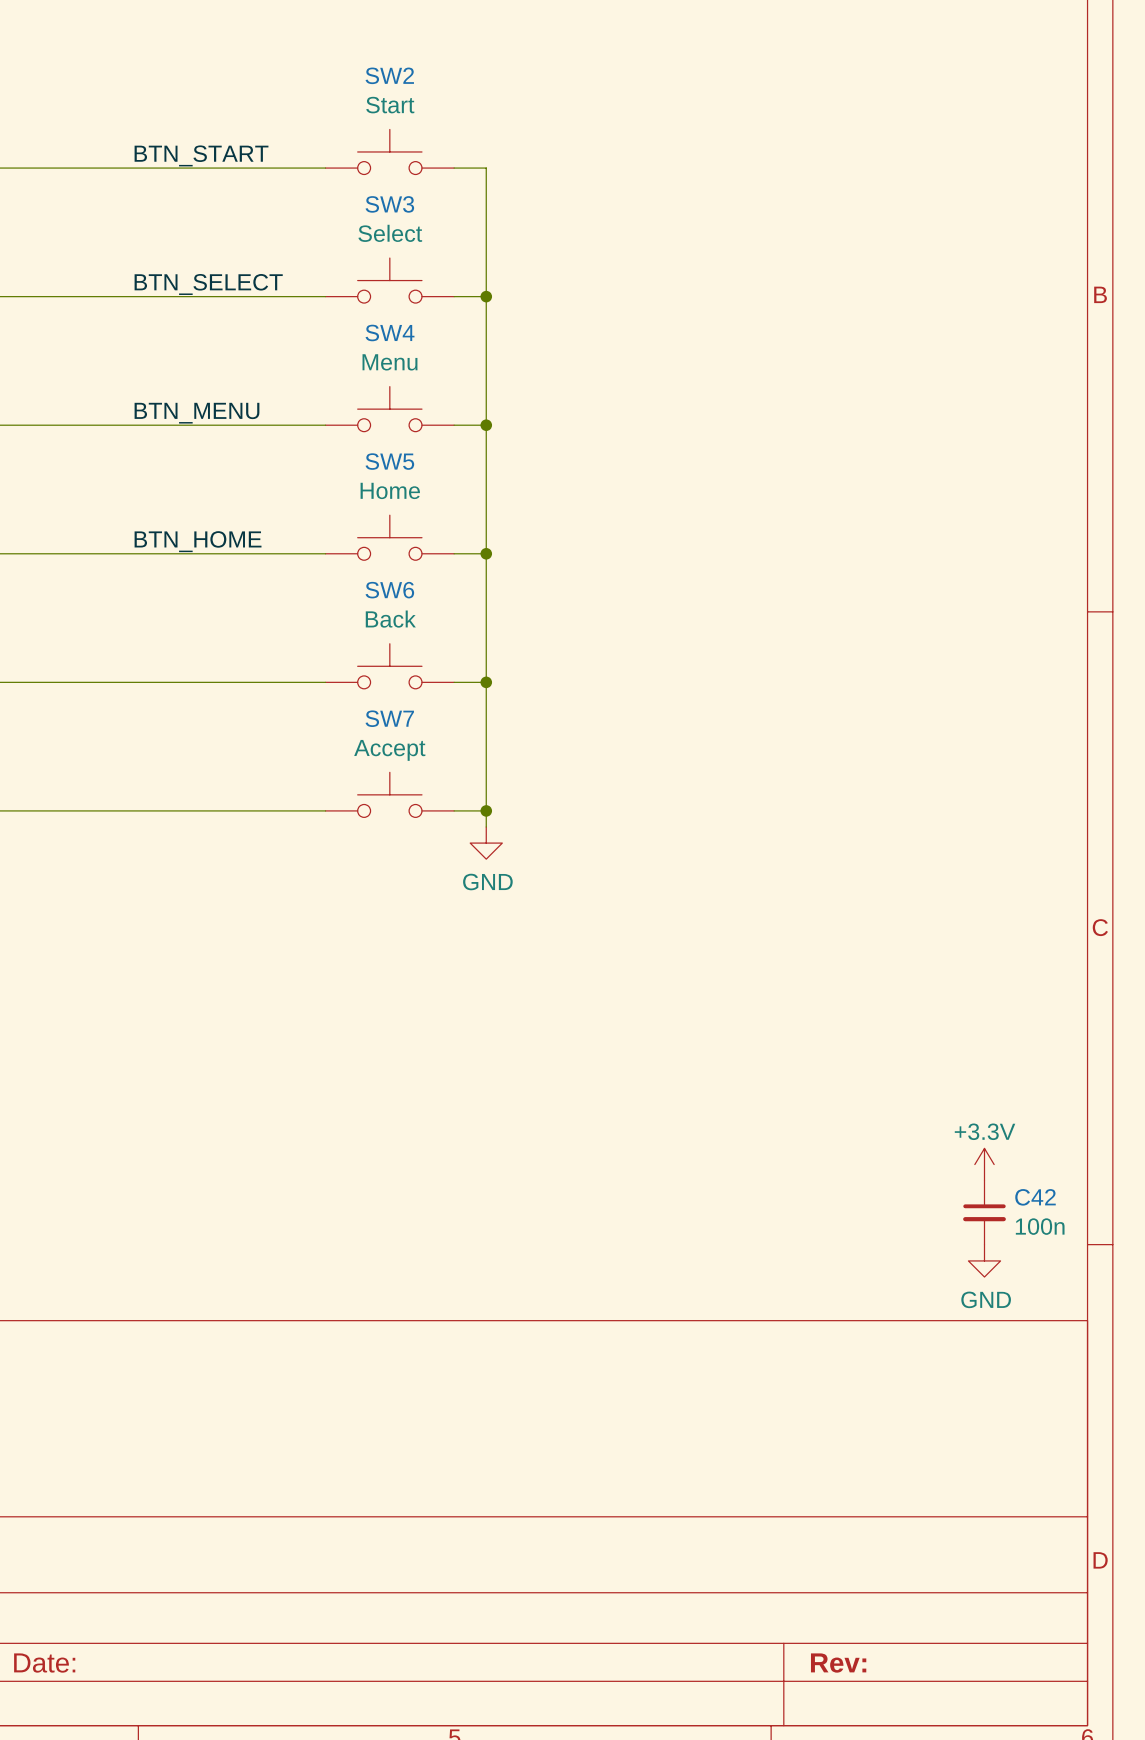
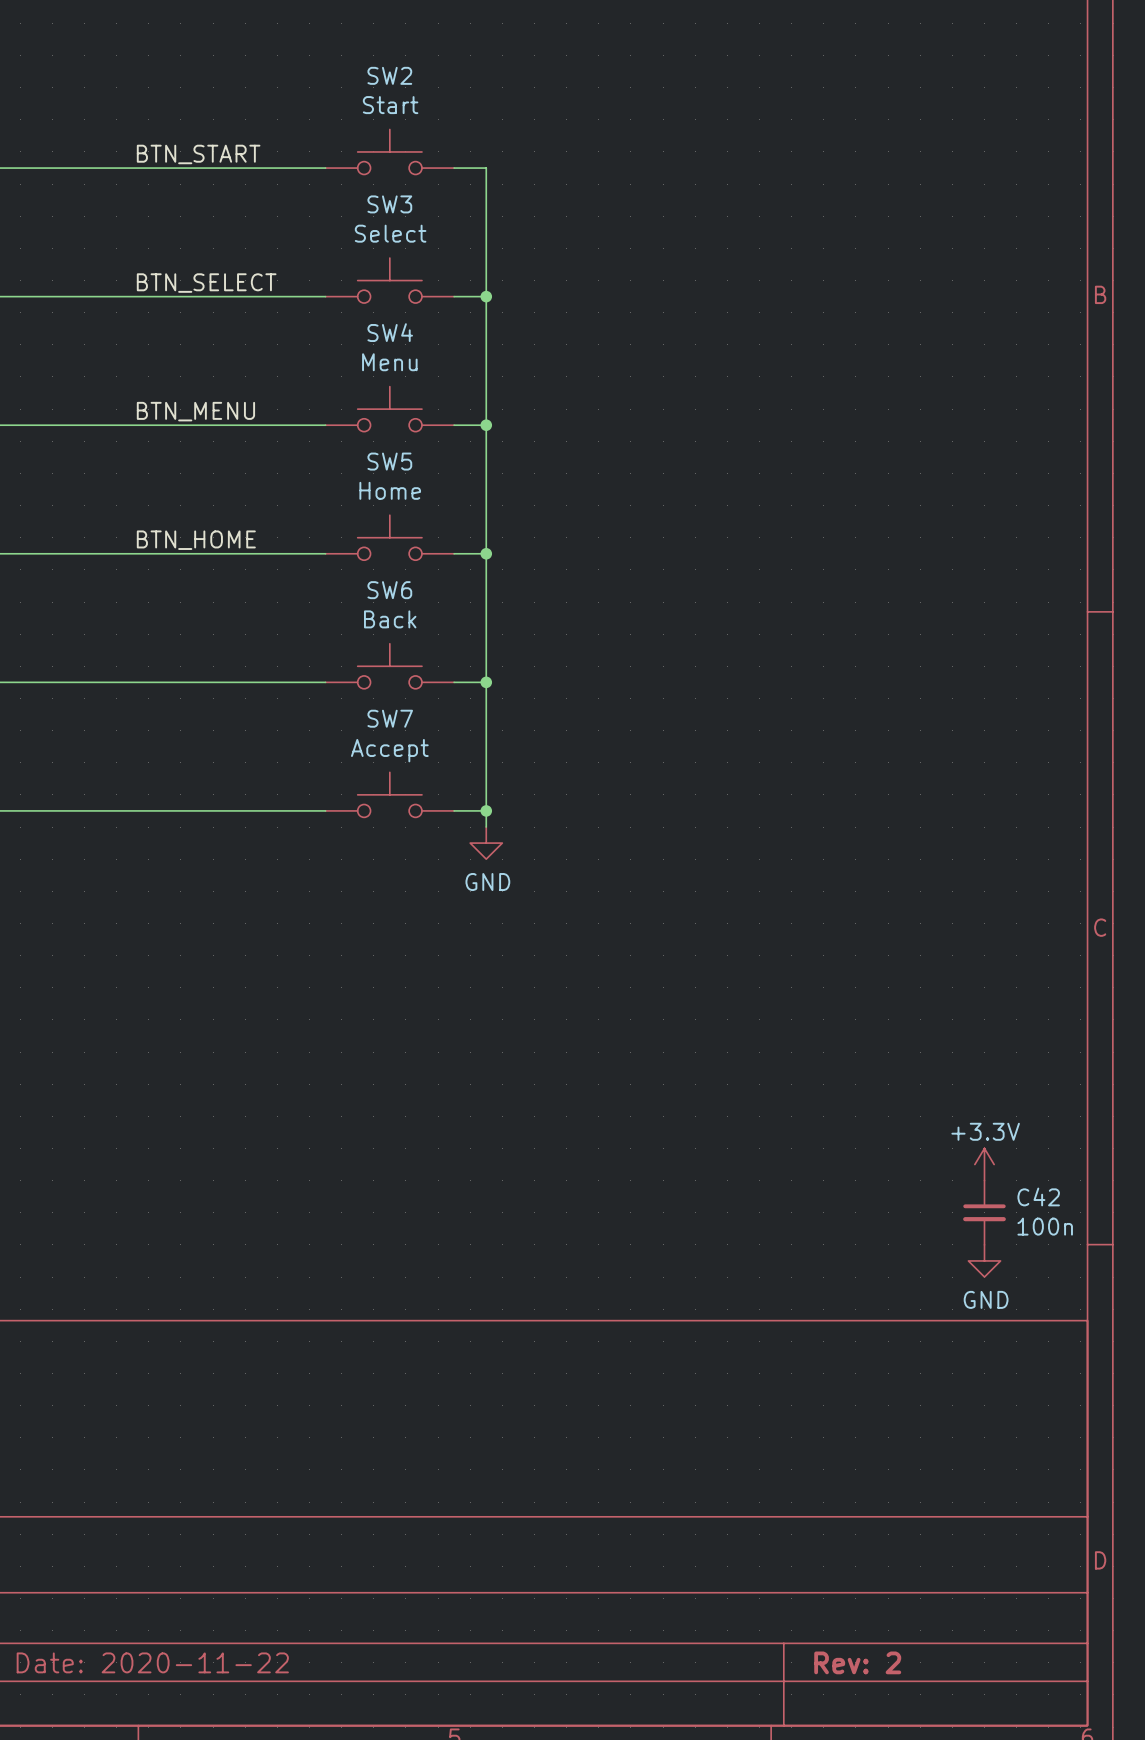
title block: Date: (44, 1663) -> Date: 2020-11-22 (152, 1662)
title block: Rev: (838, 1663) -> Rev: 2 (857, 1662)

